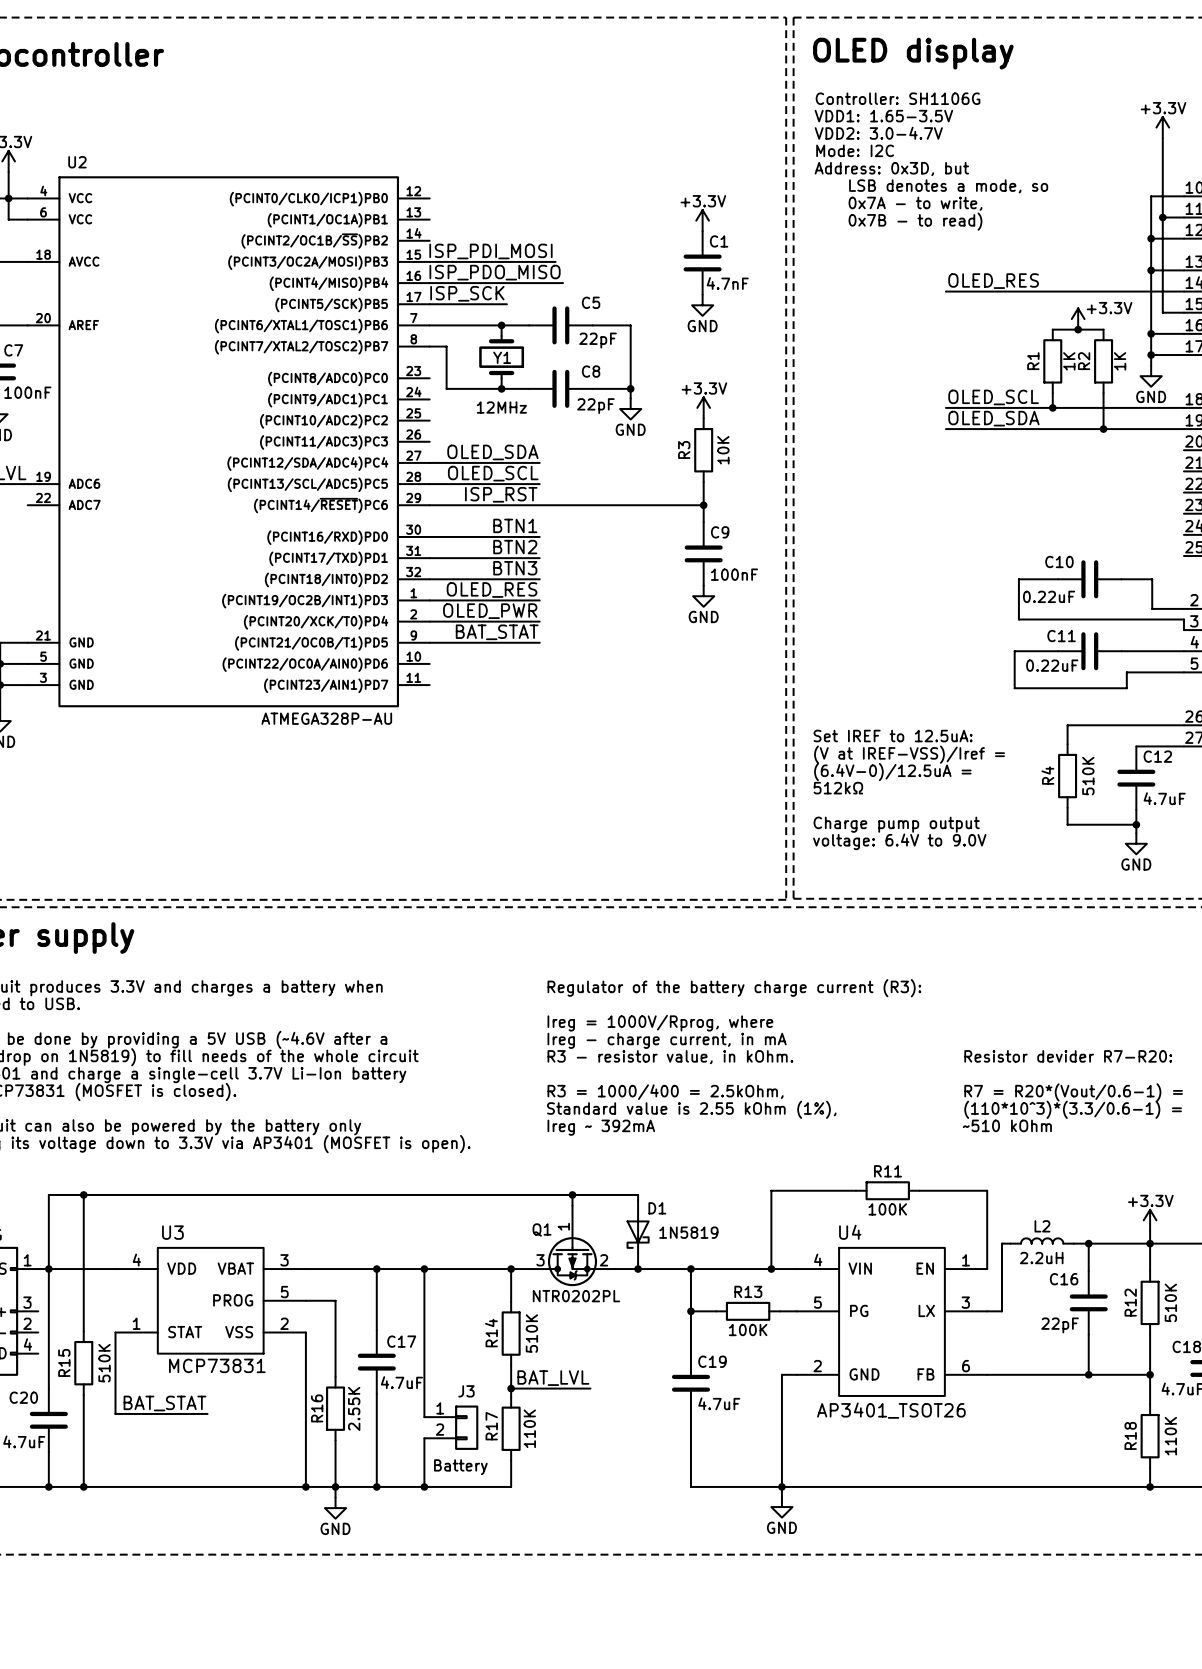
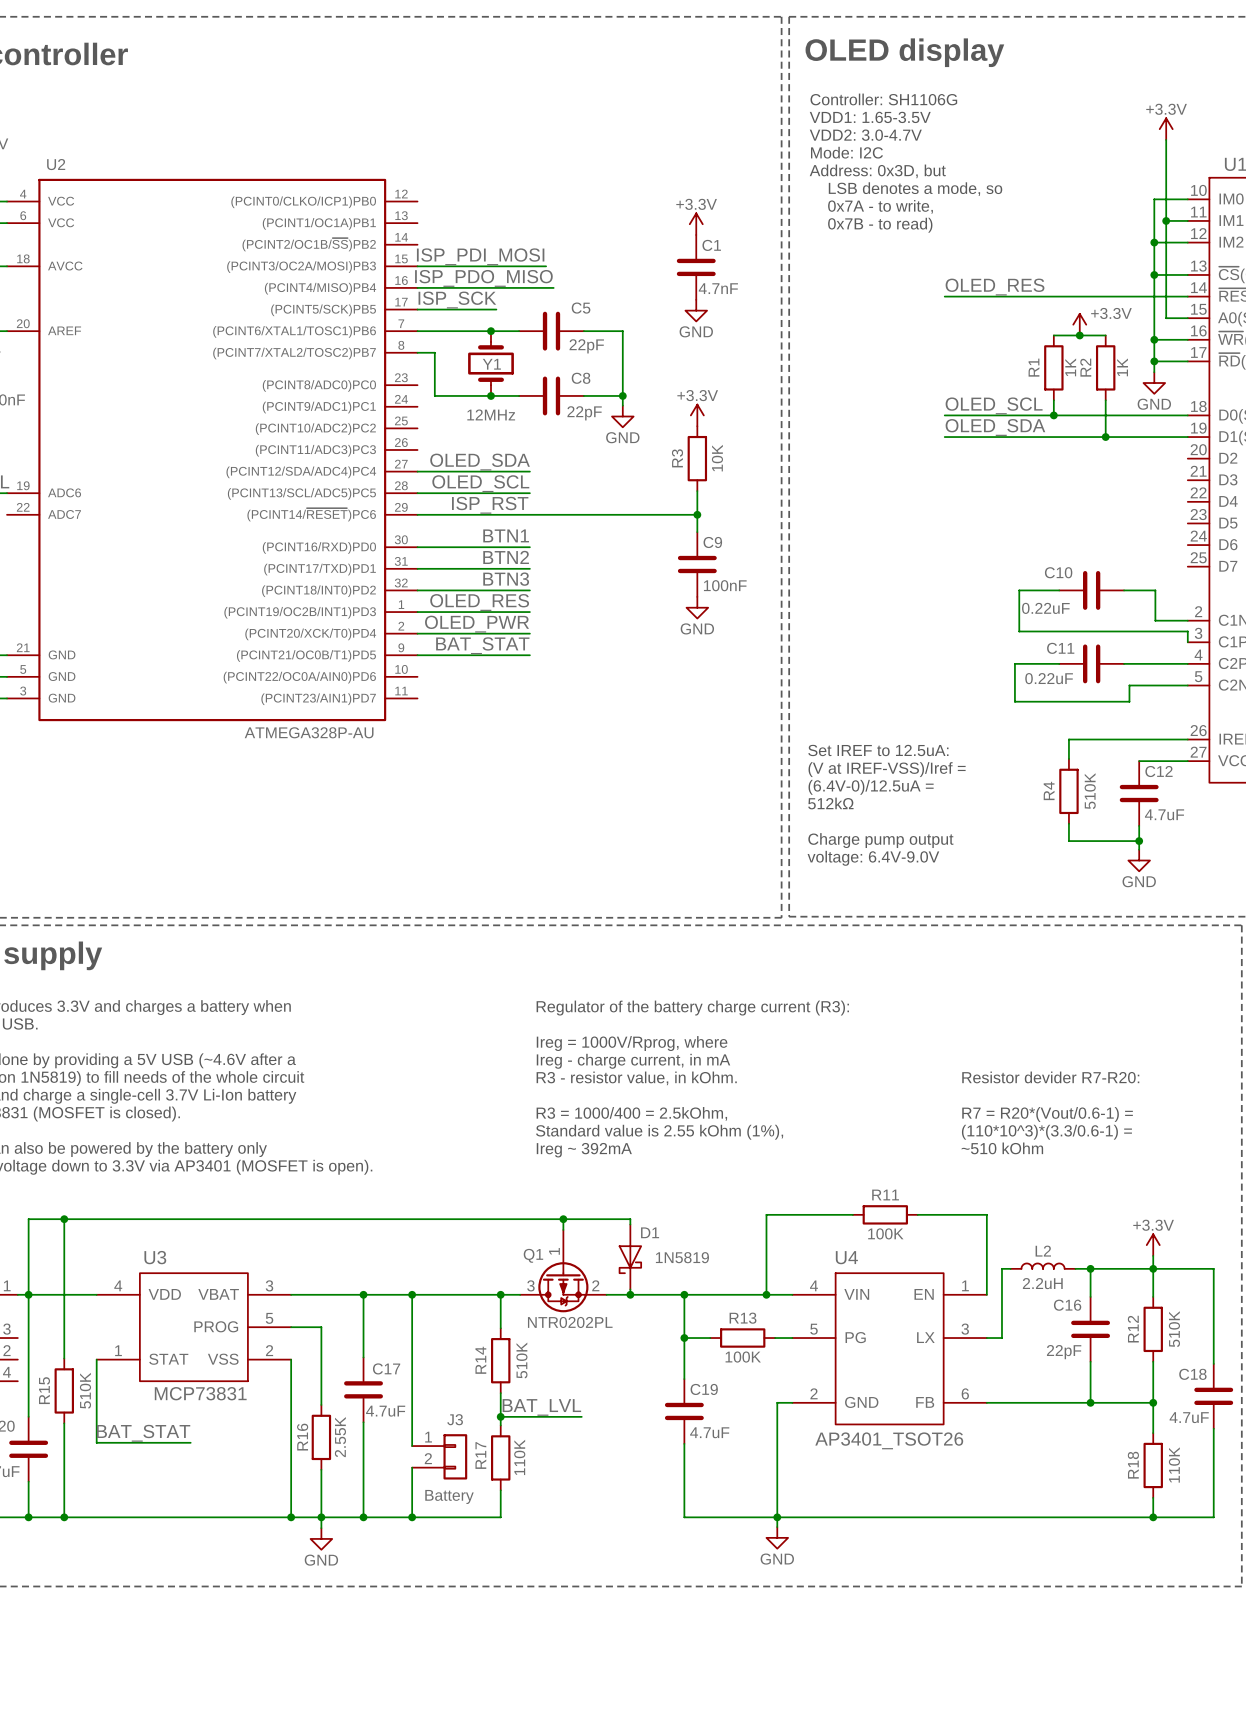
text: voltage: 6.4V to 9.0V (899, 841) -> voltage: 6.4V-9.0V (873, 858)

